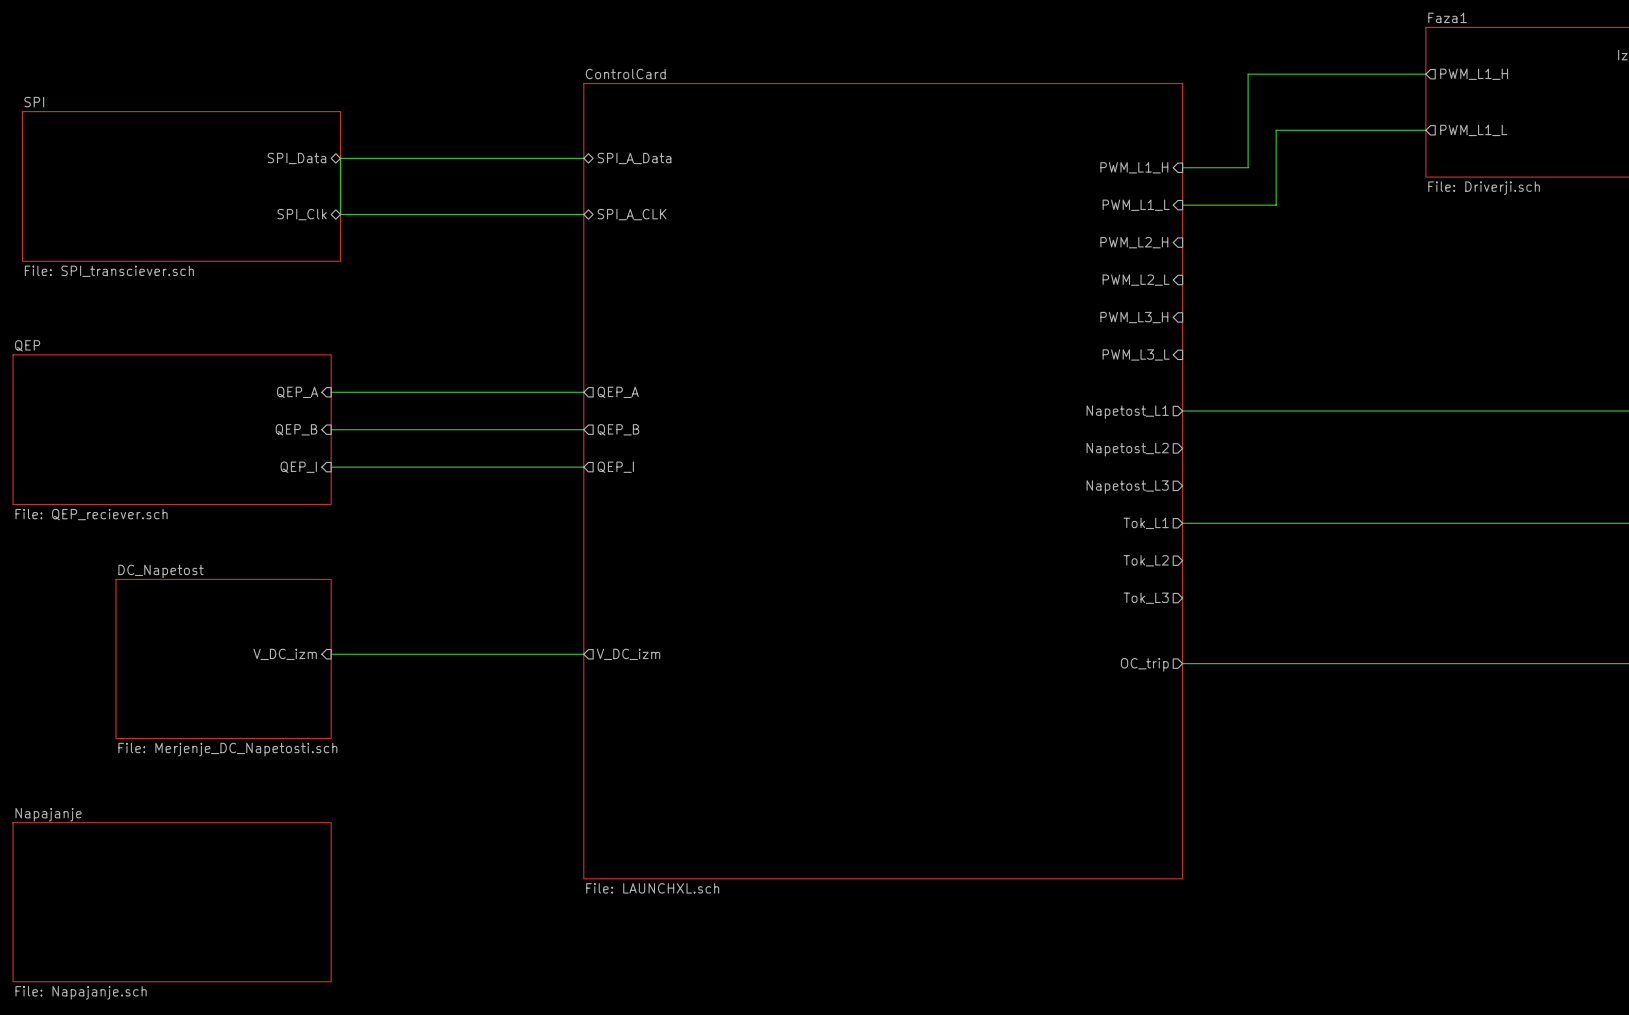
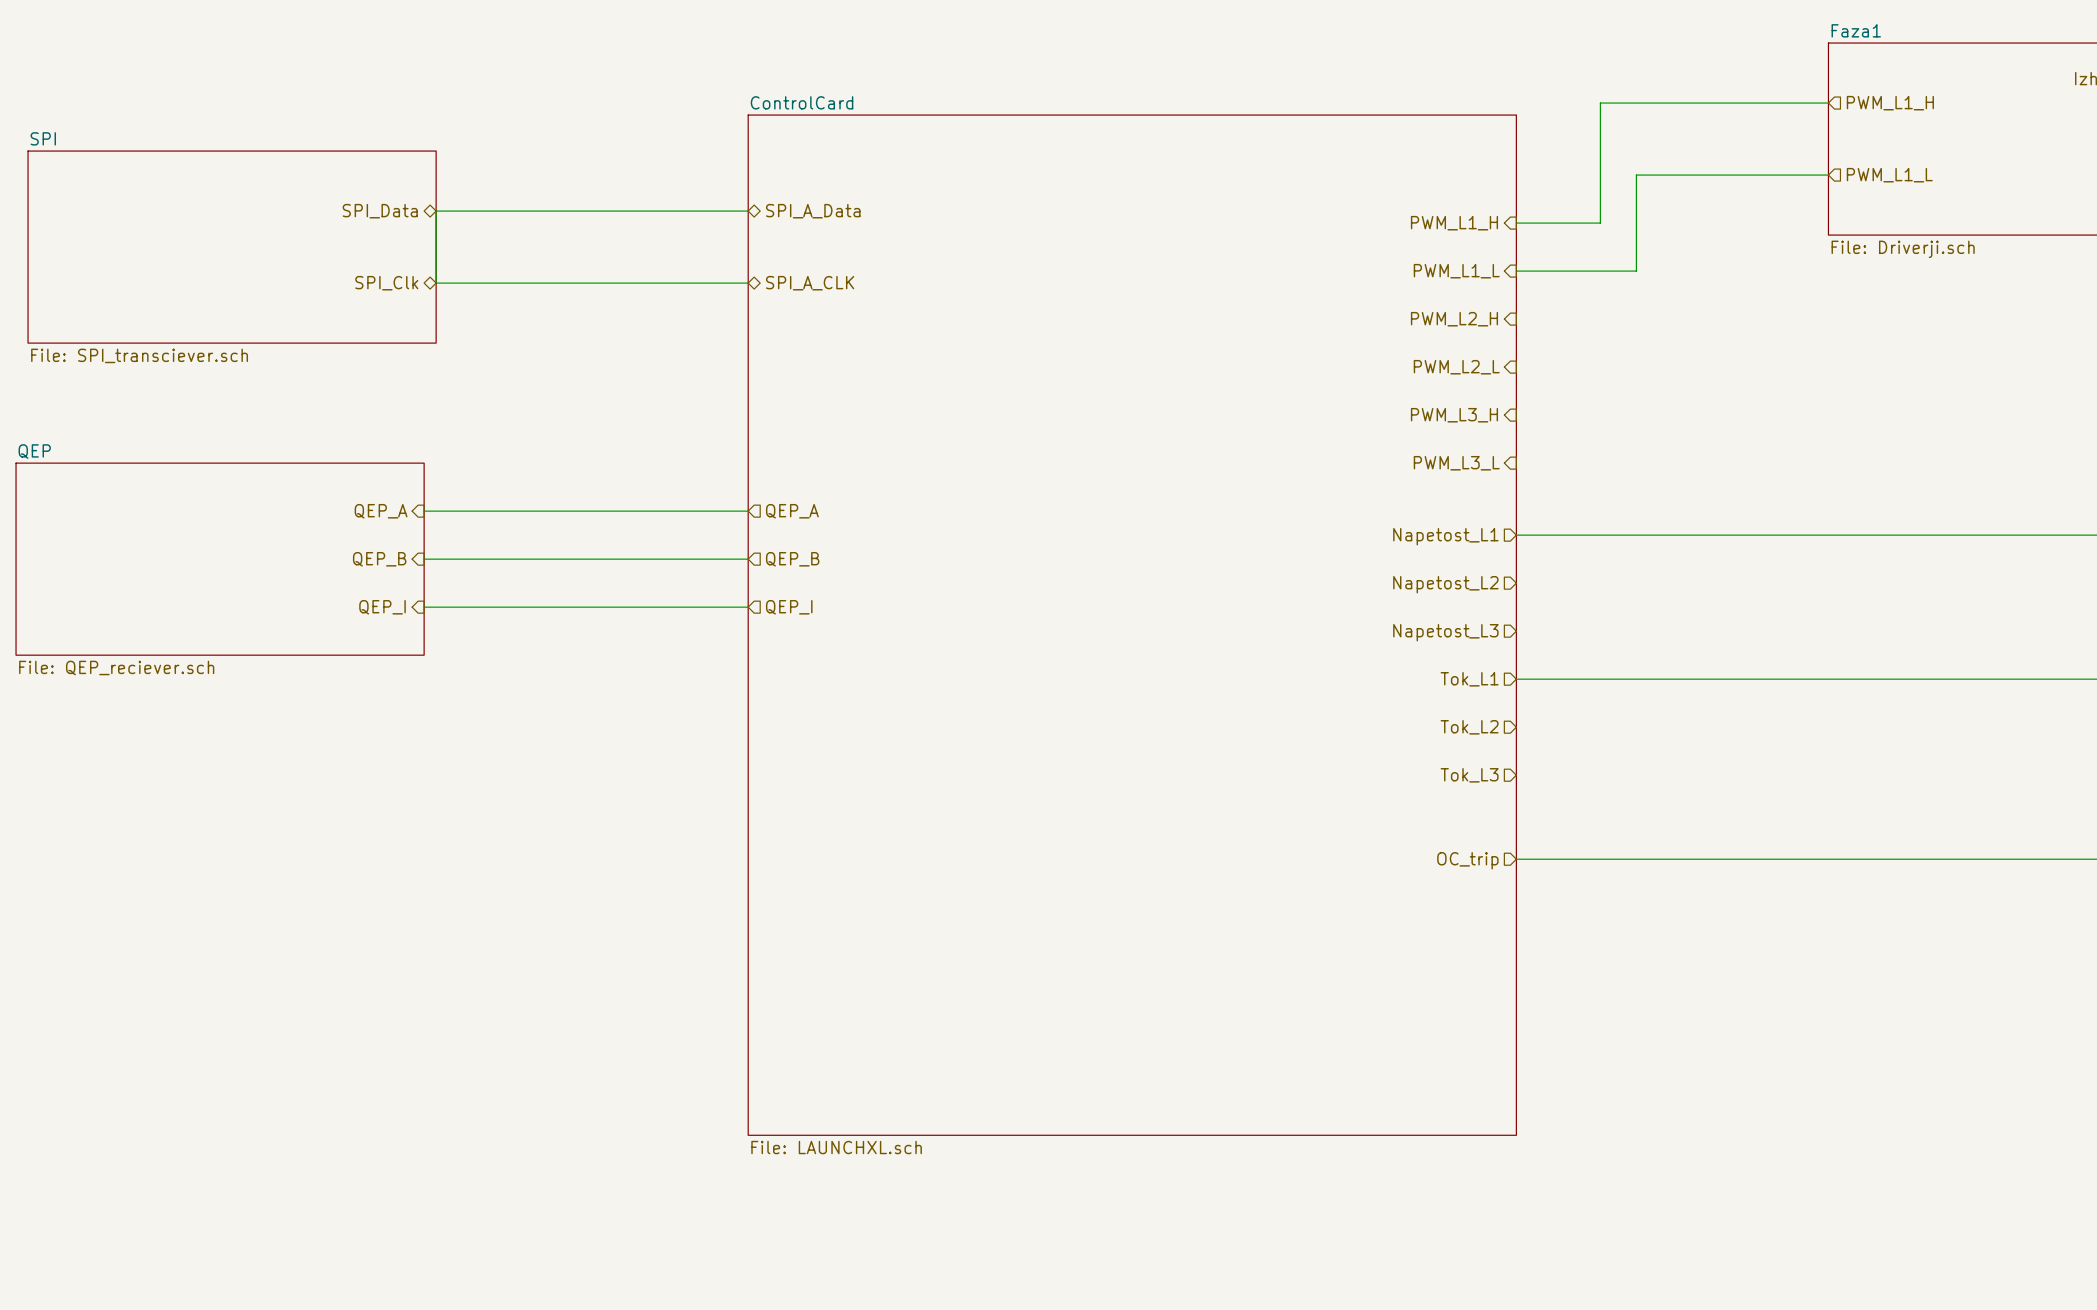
hierarchical label: V_DC_izm (285, 654) -> none
wire: (331, 654) (583, 654) -> none
hierarchical label: V_DC_izm (628, 654) -> none
sheet DC_Napetost: File: Merjenje_DC_Napetosti.sch (223, 658) -> none
sheet Napajanje: File: Napajanje.sch (172, 902) -> none

